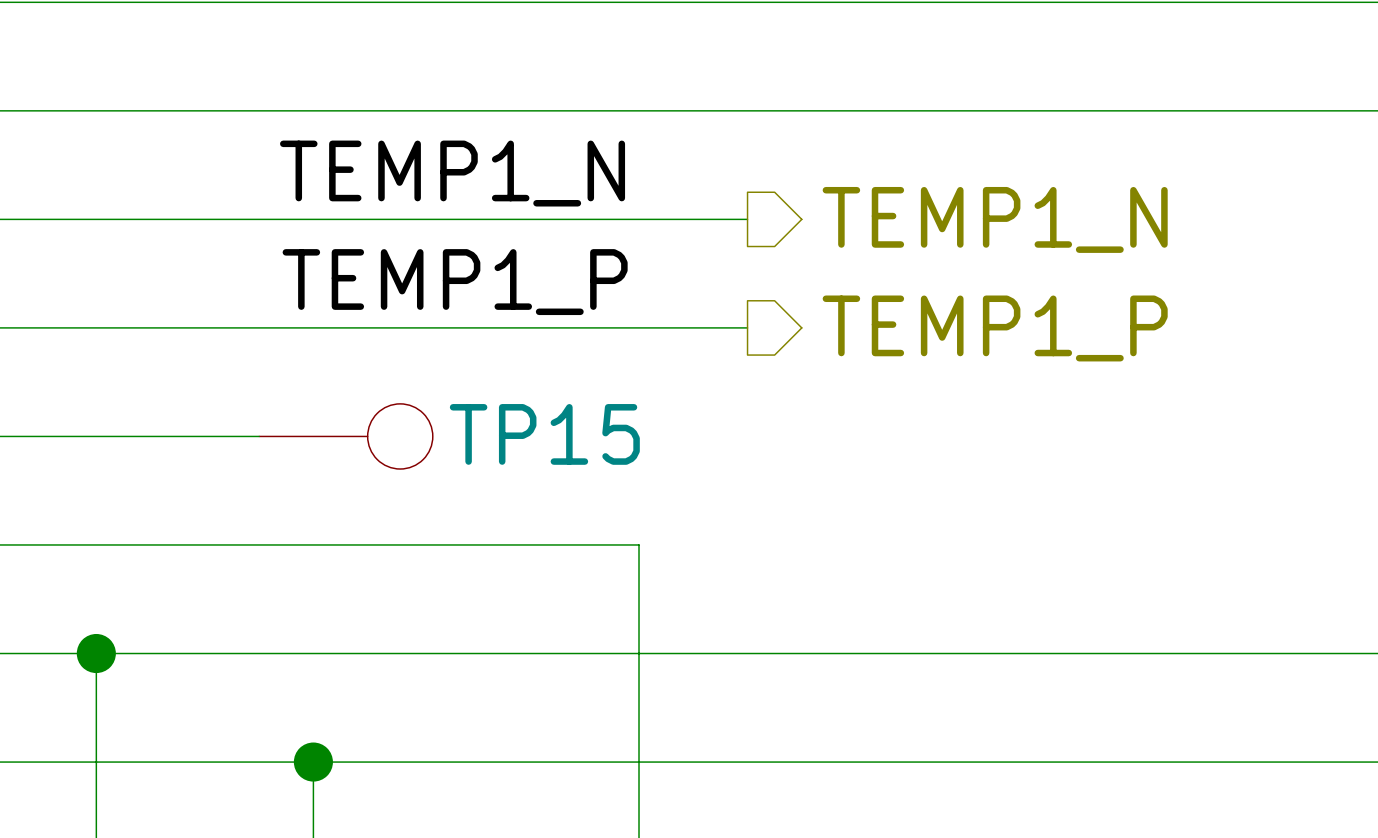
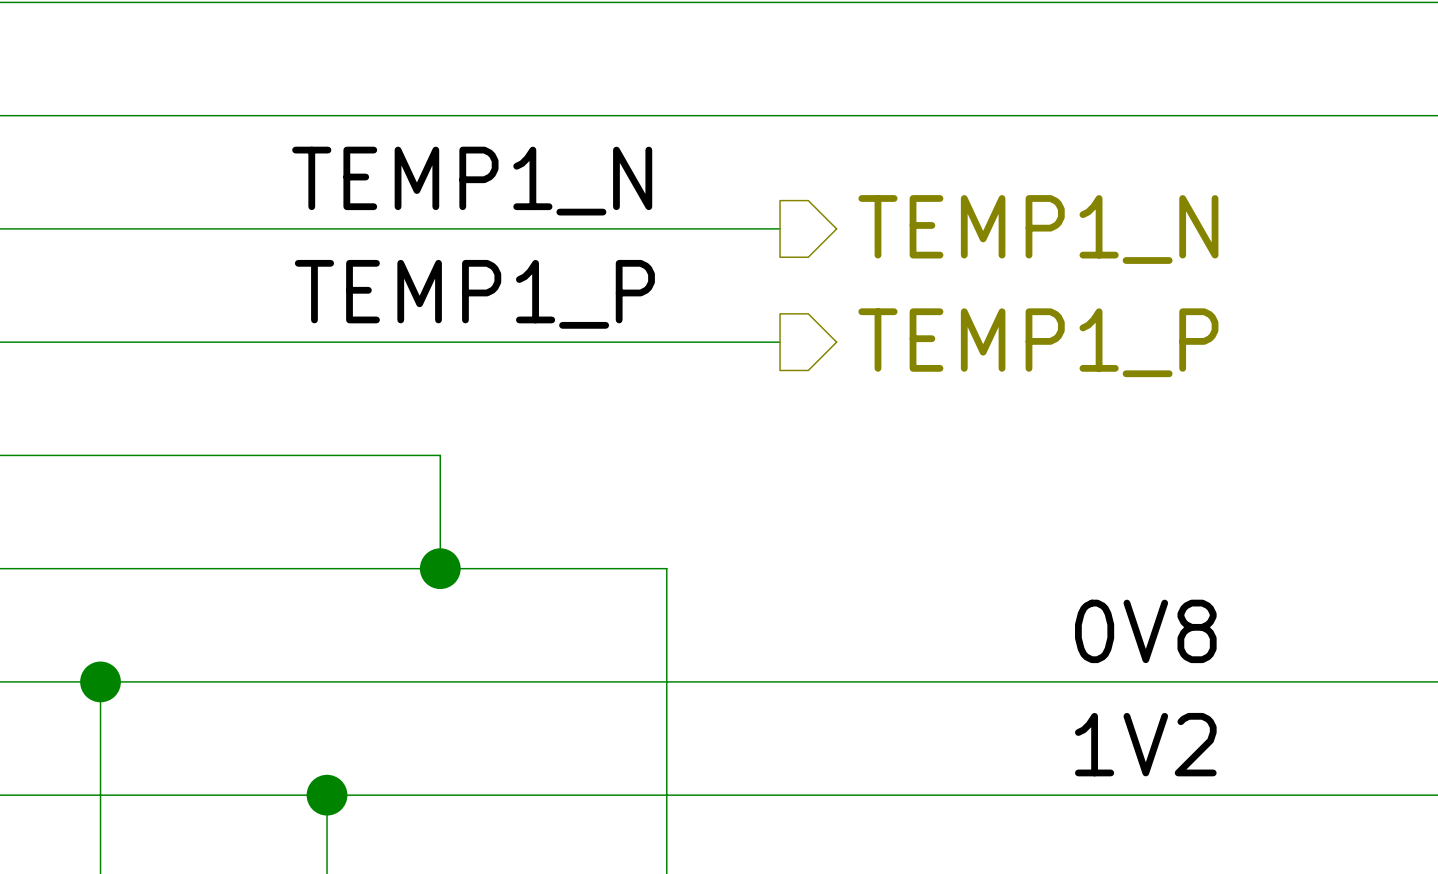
wire: none -> (270, 455) (440, 455) (440, 568)
TP15: (345, 436) -> none
junction: none -> (440, 568)
label: none -> 0V8 (1145, 631)
label: none -> 1V2 (1145, 744)

